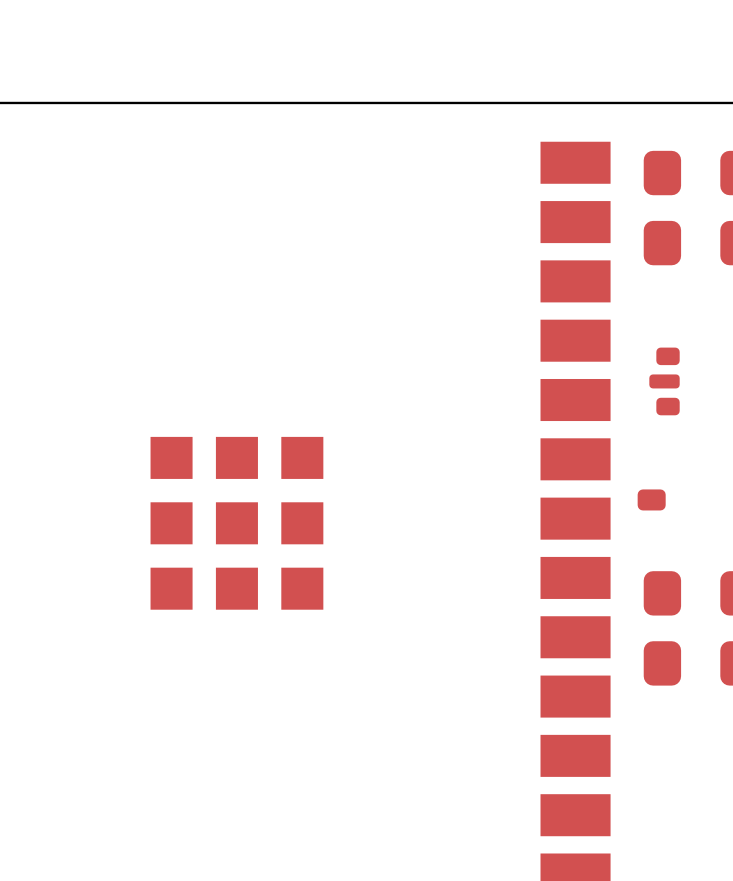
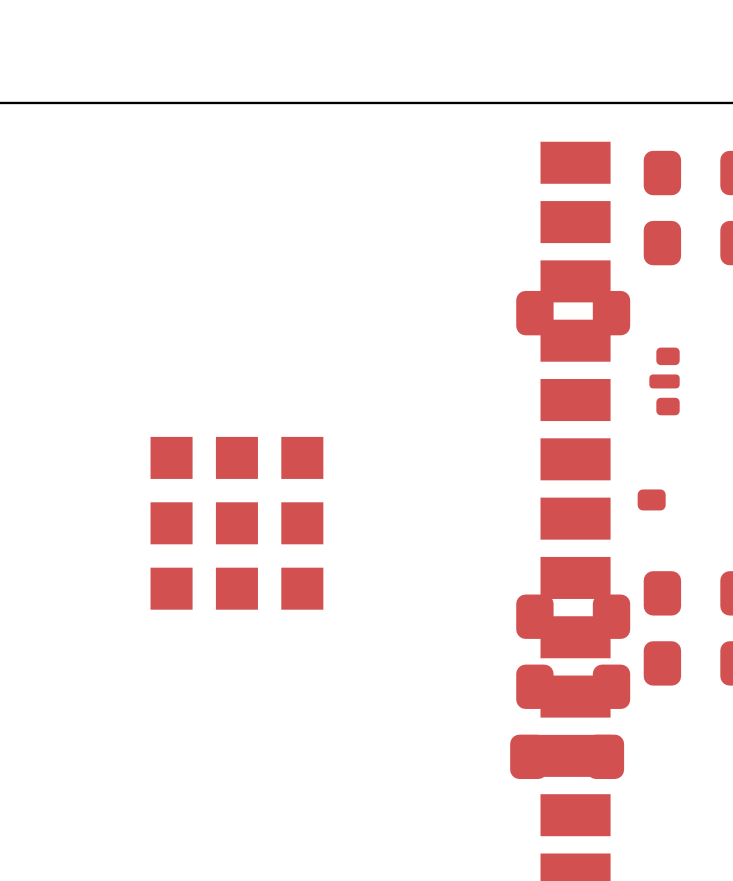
part: none -> (573, 313)
part: none -> (573, 616)
part: none -> (573, 686)
part: none -> (567, 756)

